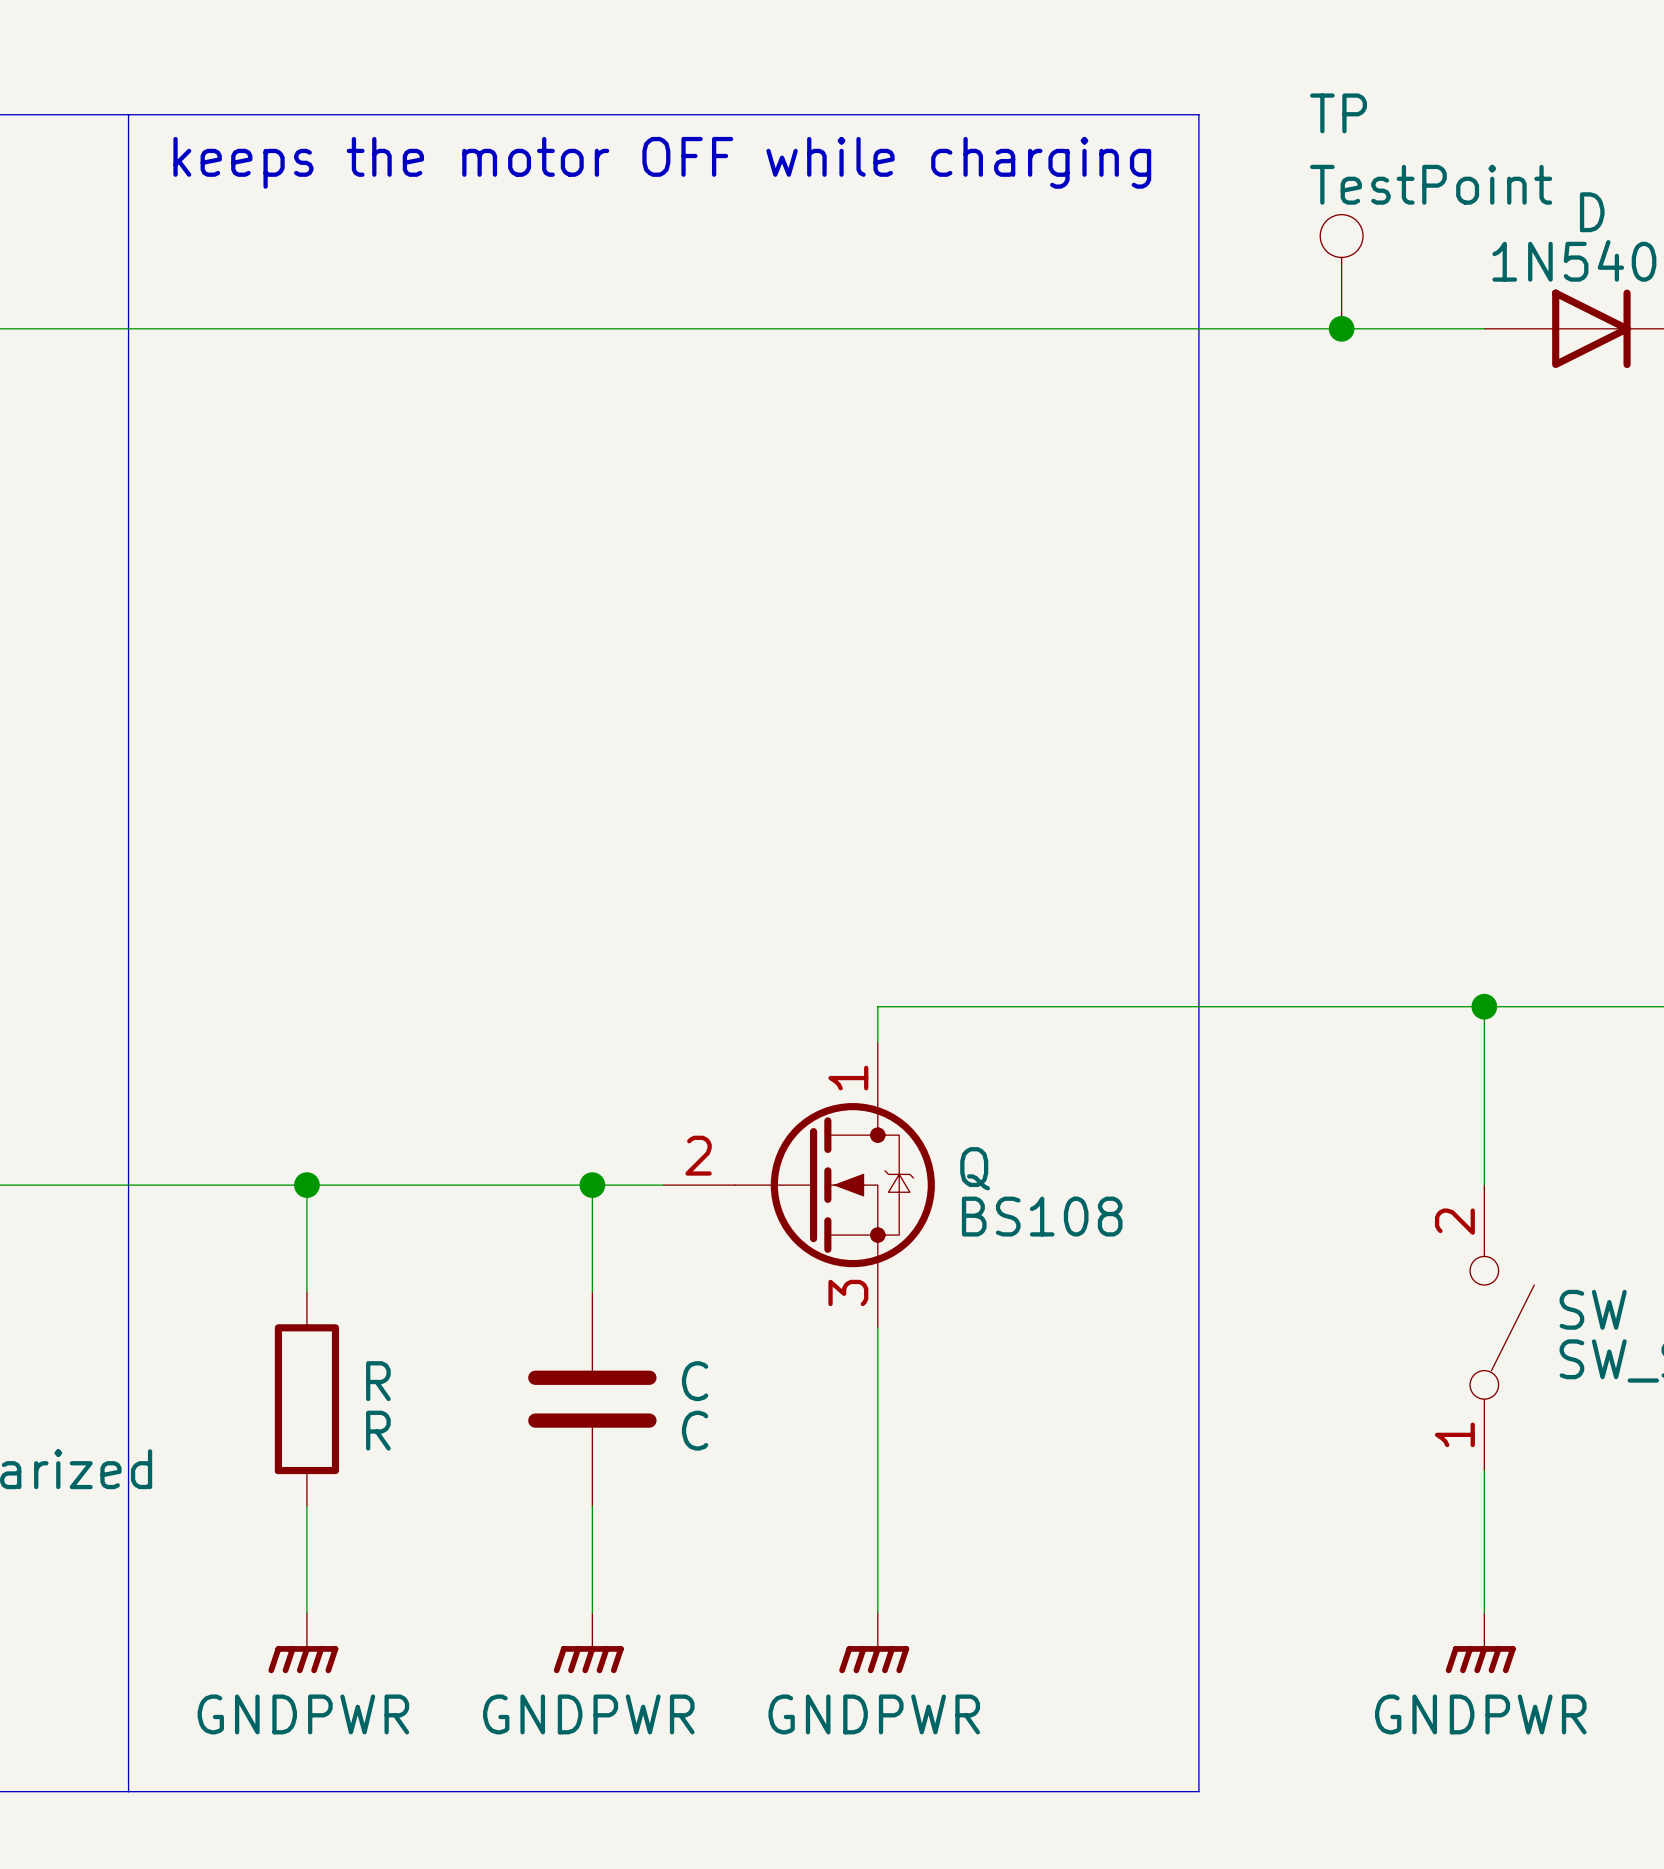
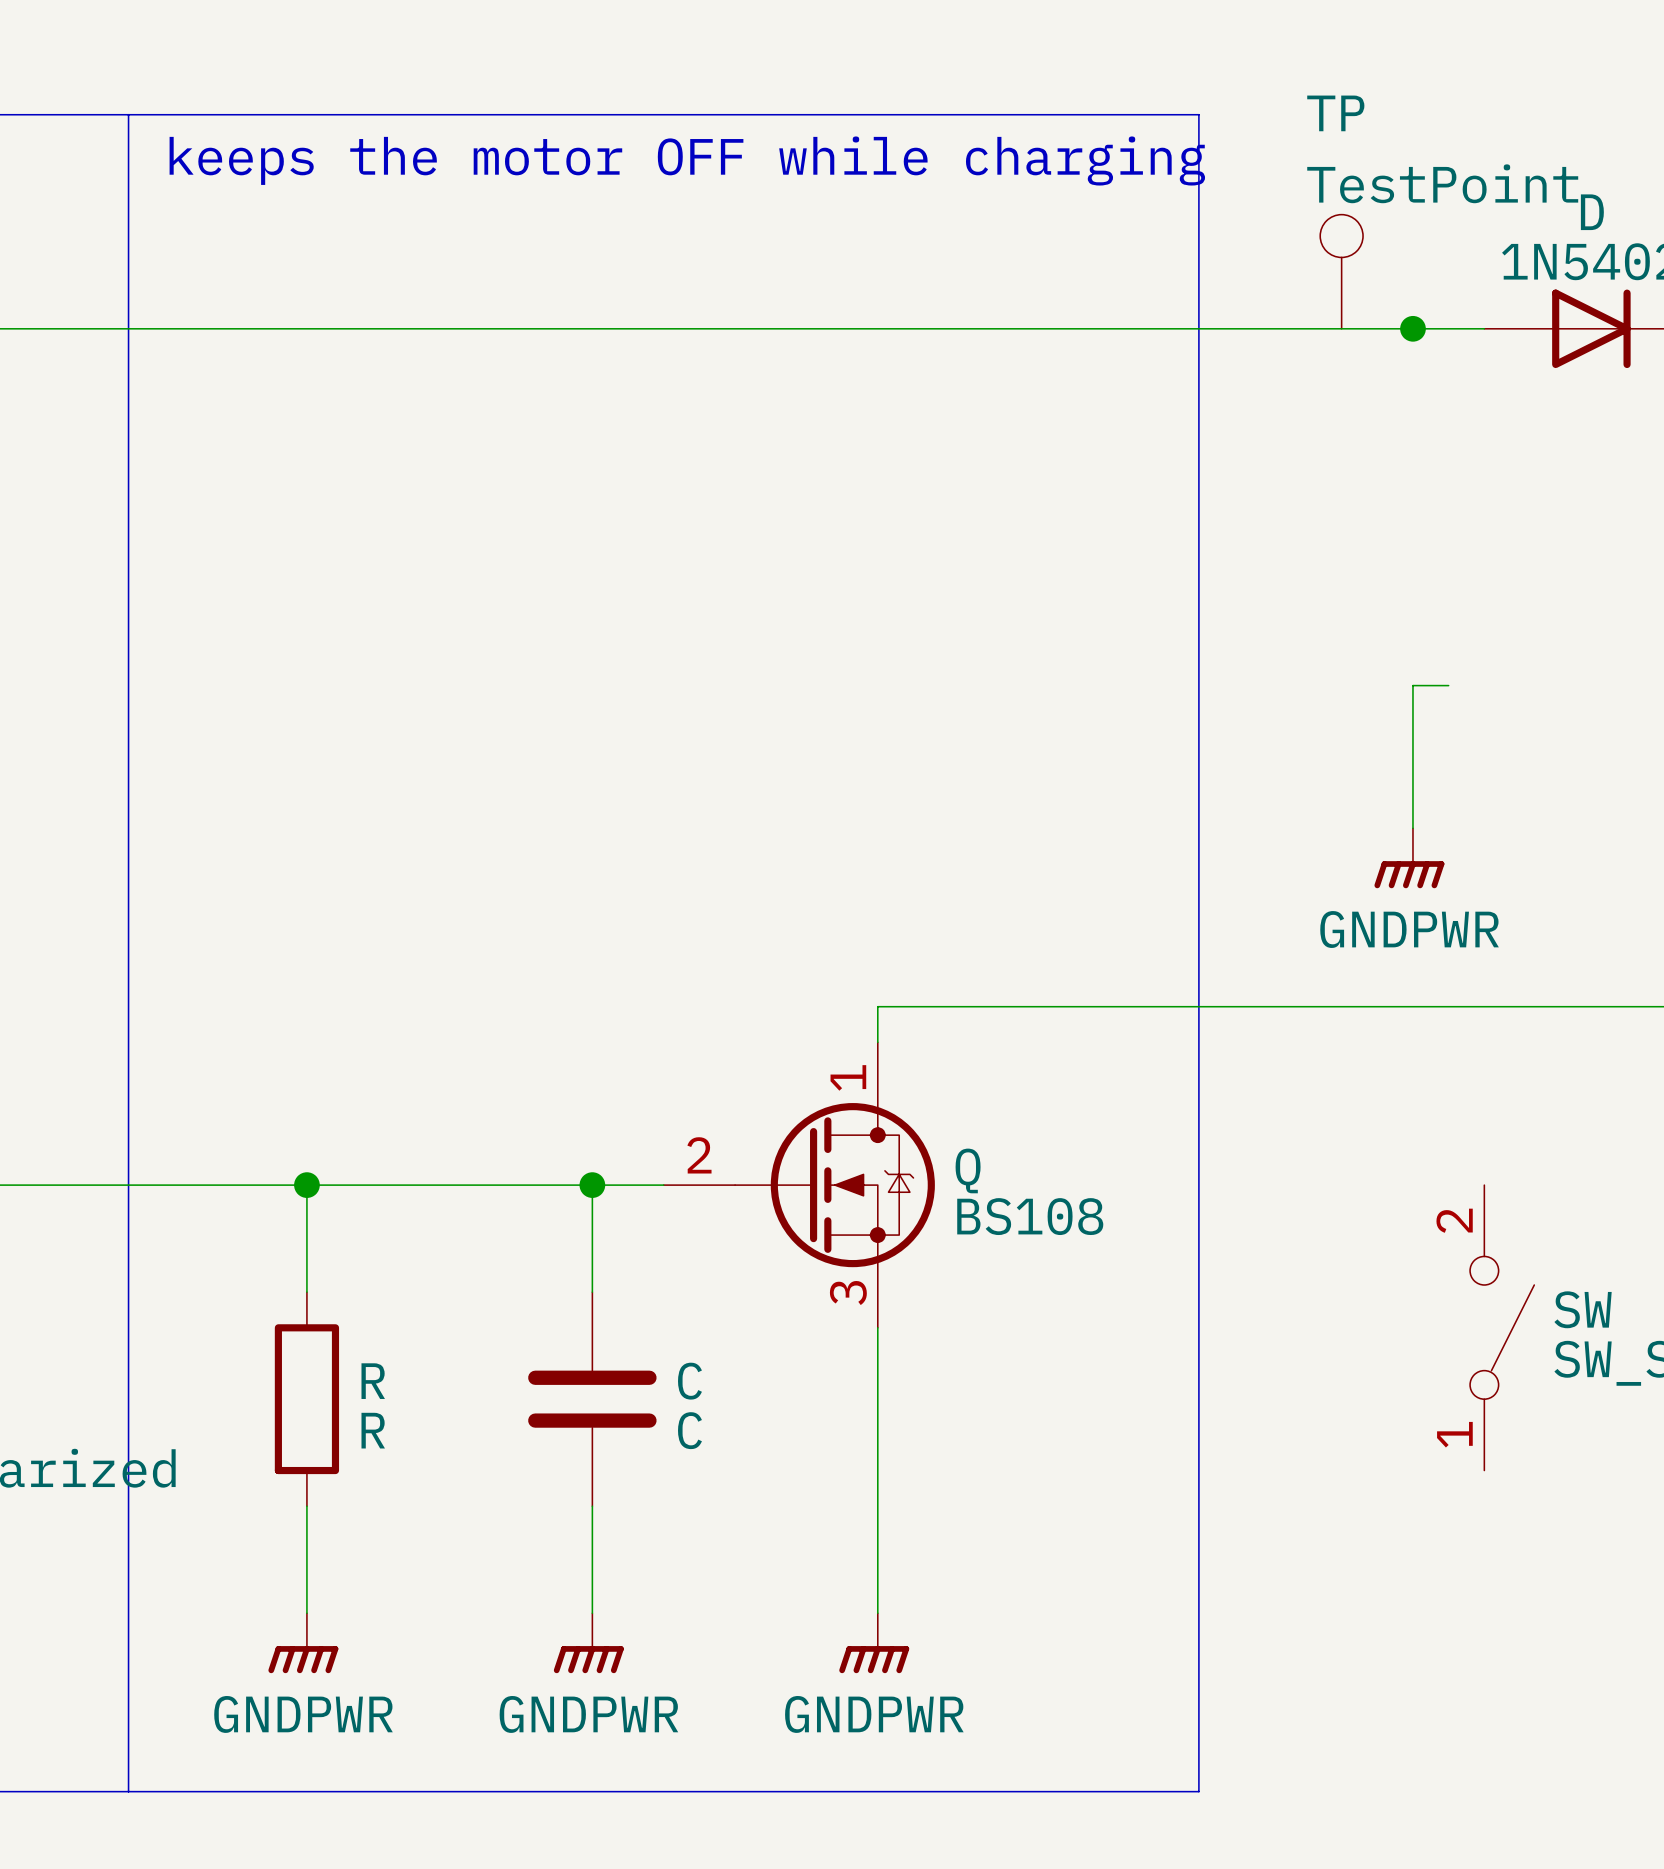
junction position: (1341, 328) -> (1412, 328)
wire: none -> (1448, 685) (1412, 685) (1412, 828)
power symbol: none -> GNDPWR (1409, 858)
wire: (1484, 1006) (1484, 1185) -> none
junction: (1484, 1006) -> none
wire: (1484, 1470) (1484, 1613) -> none
power symbol: GNDPWR (1480, 1643) -> none

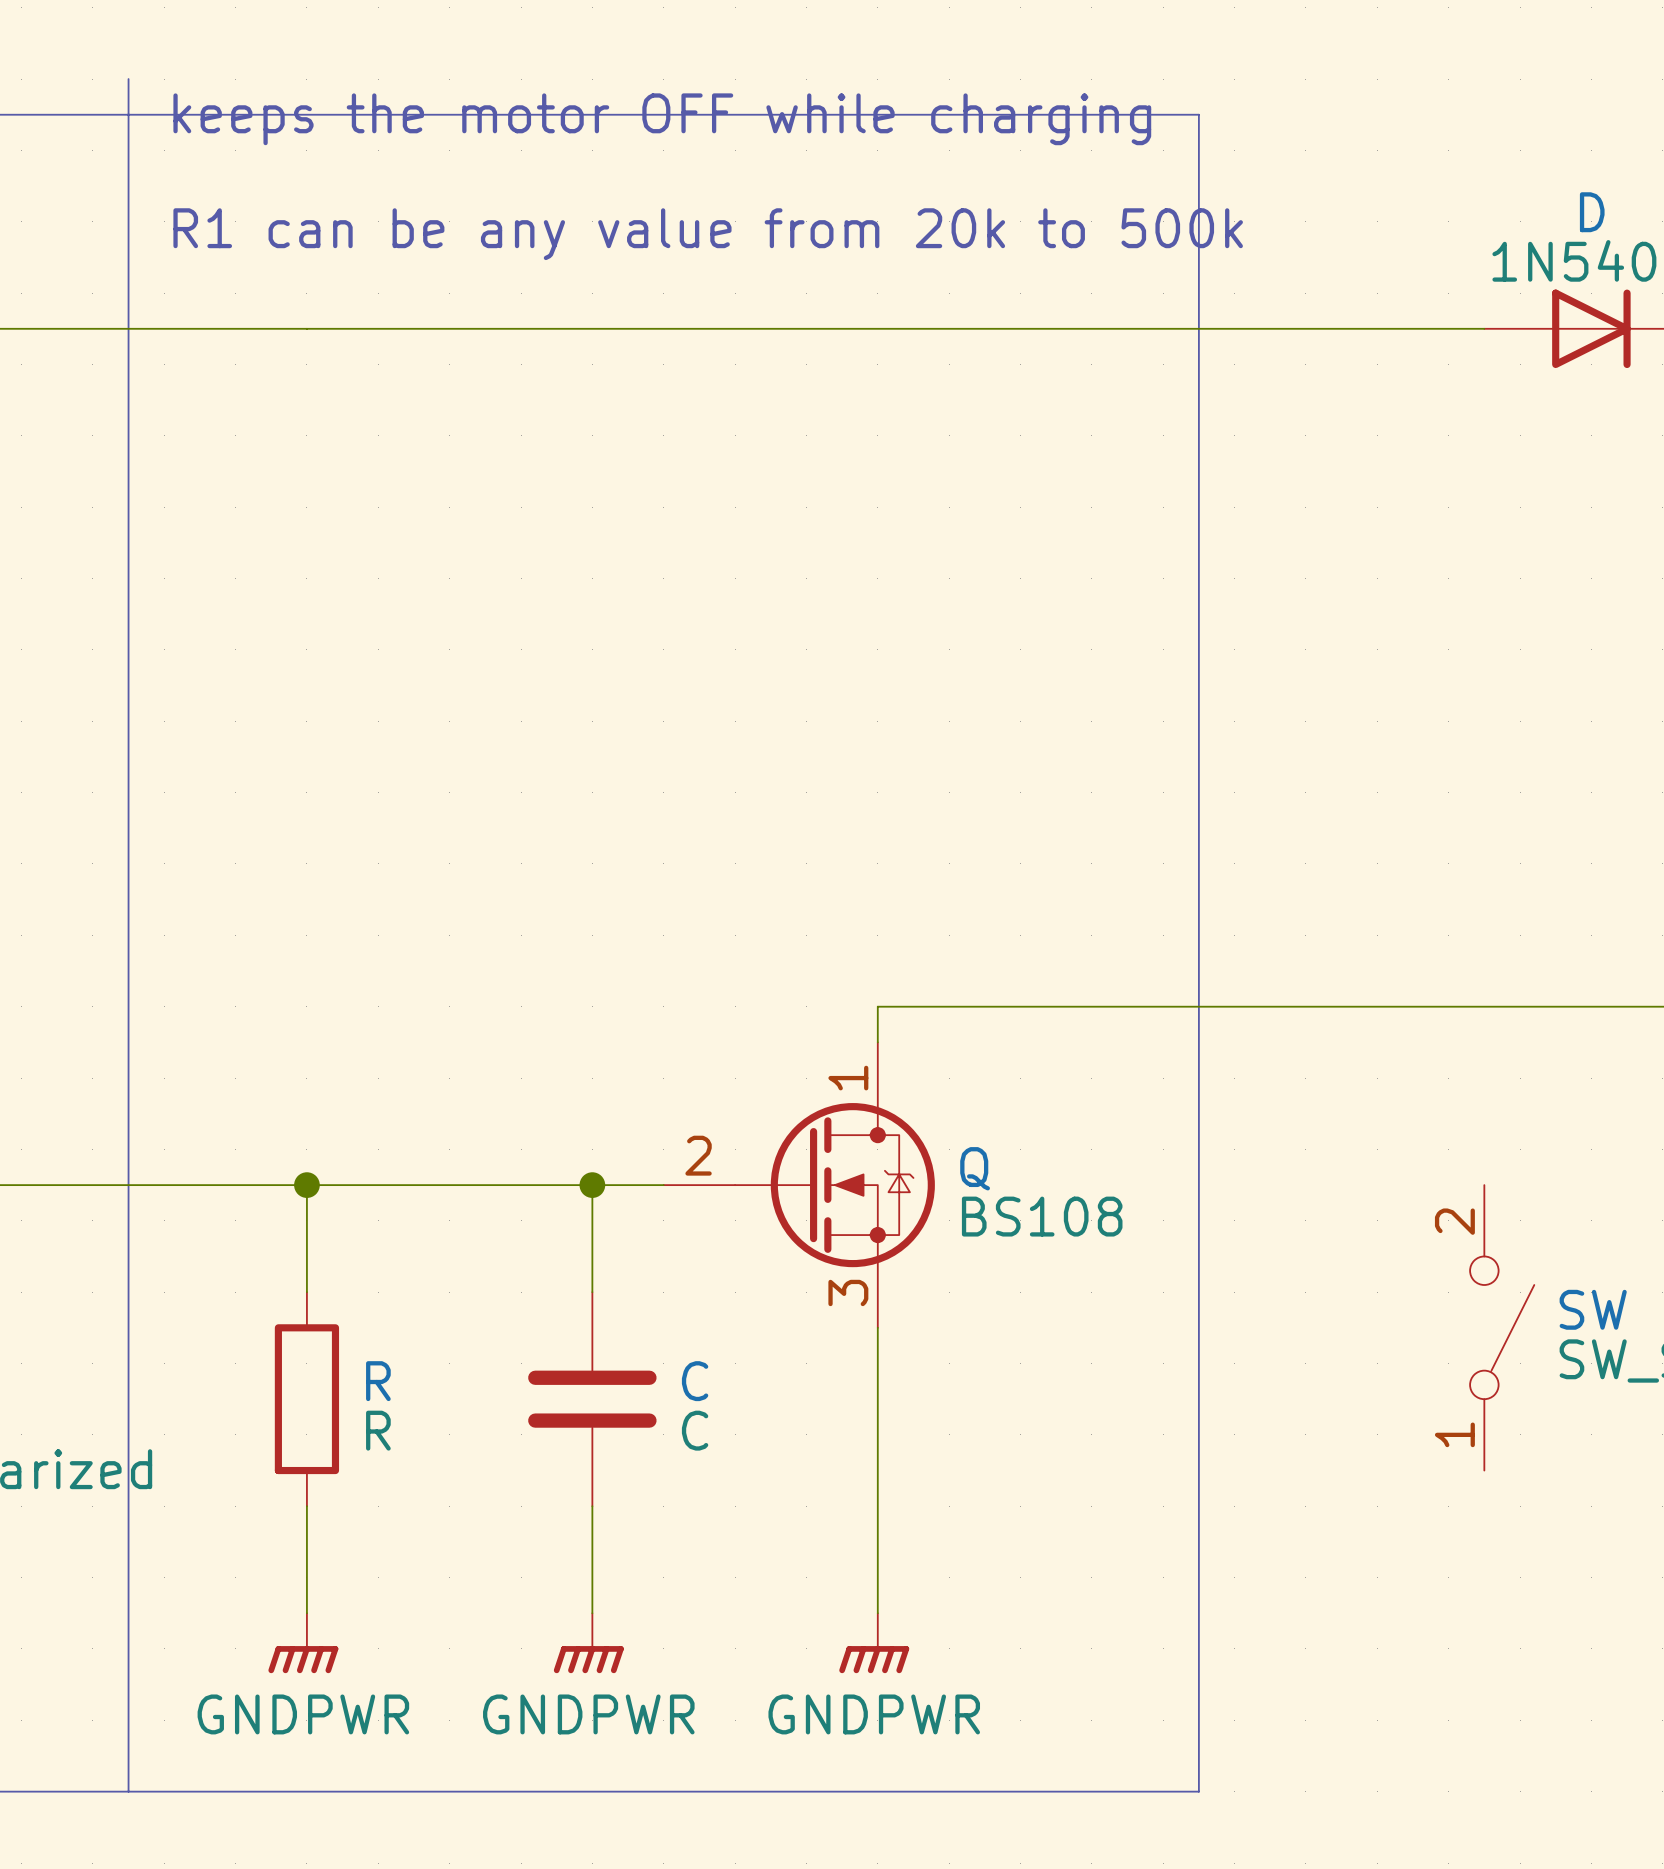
line: none -> (128, 79) (128, 114)
text position: keeps the motor OFF while charging (687, 161) -> keeps the motor OFF while charging (662, 119)
text: none -> R1 can be any value from 20k to 500k (708, 234)
TP: TestPoint (1341, 271) -> none
junction: (1412, 328) -> none
wire: (1448, 685) (1412, 685) (1412, 828) -> none
power symbol: GNDPWR (1409, 858) -> none

